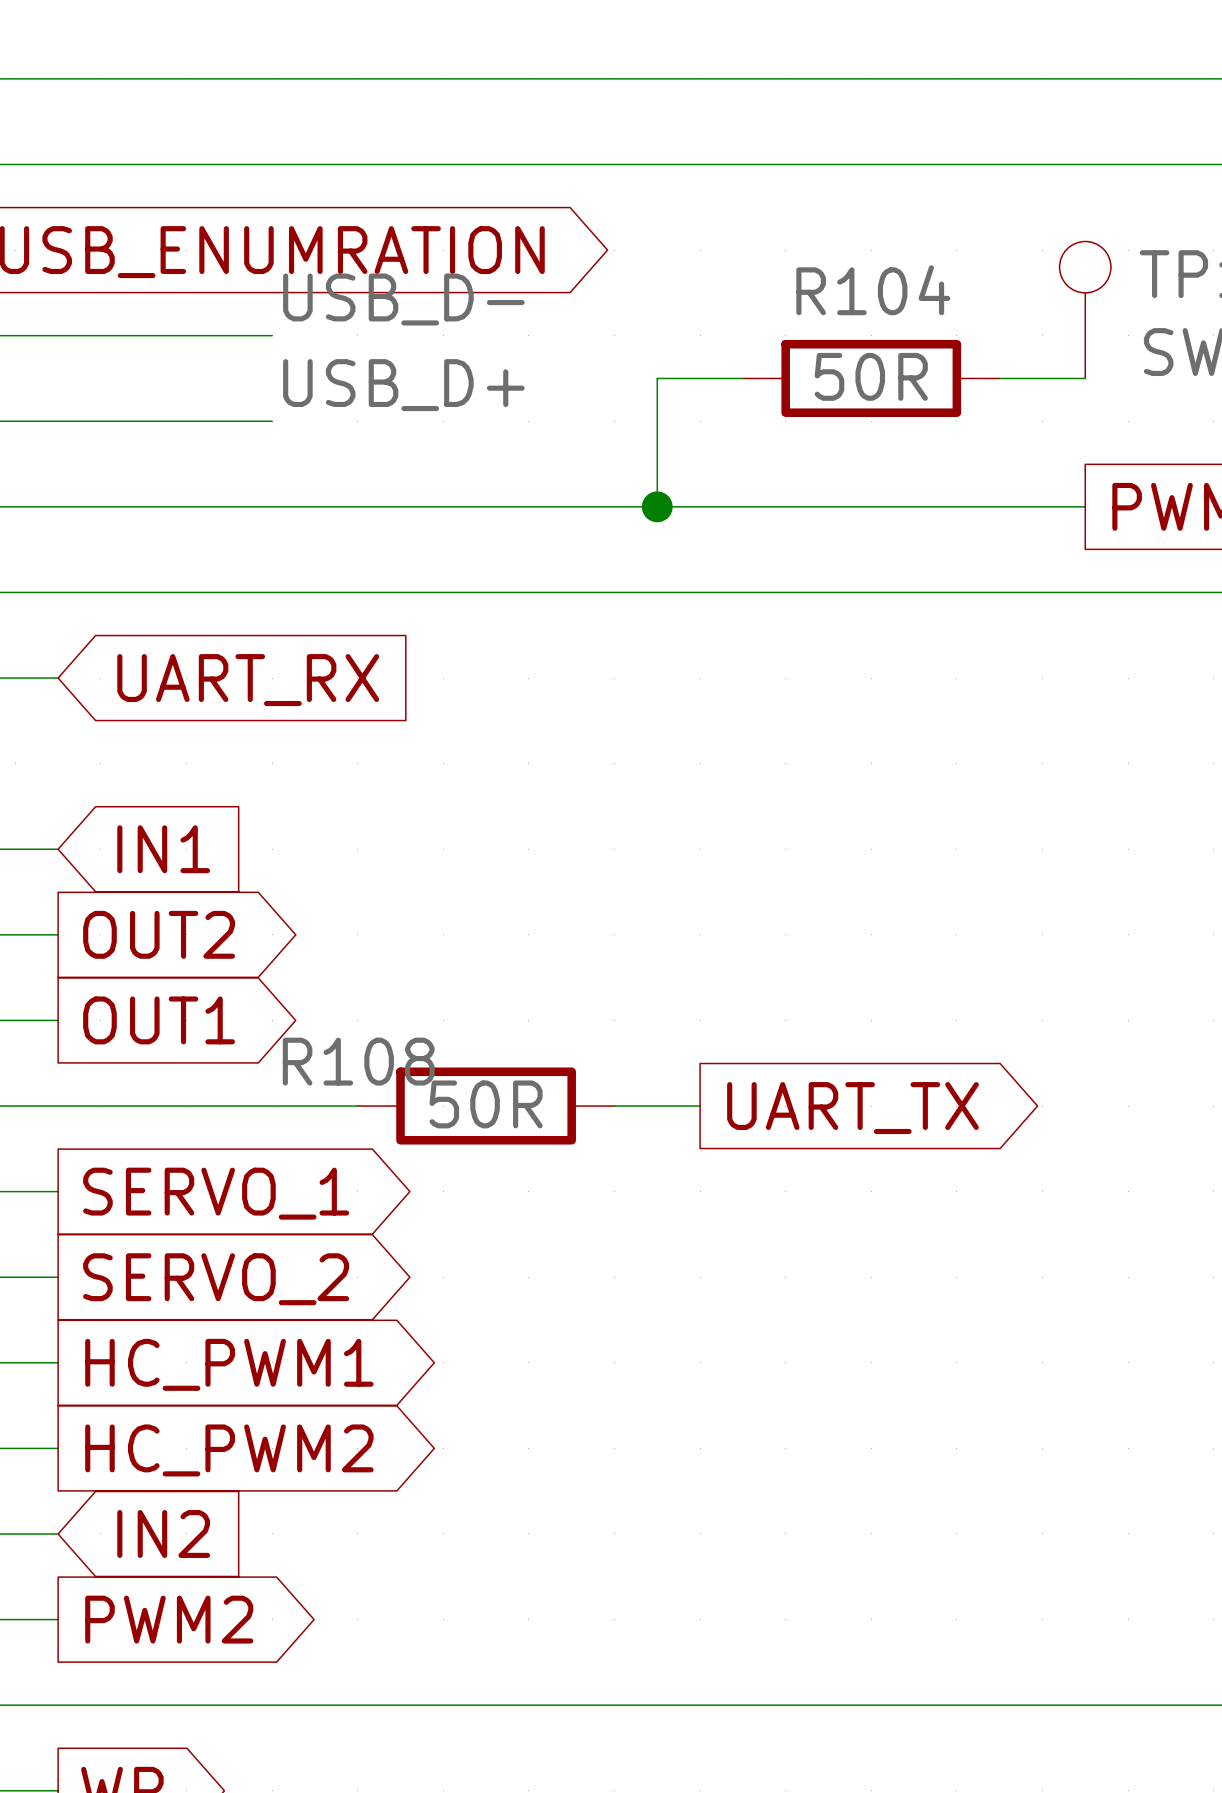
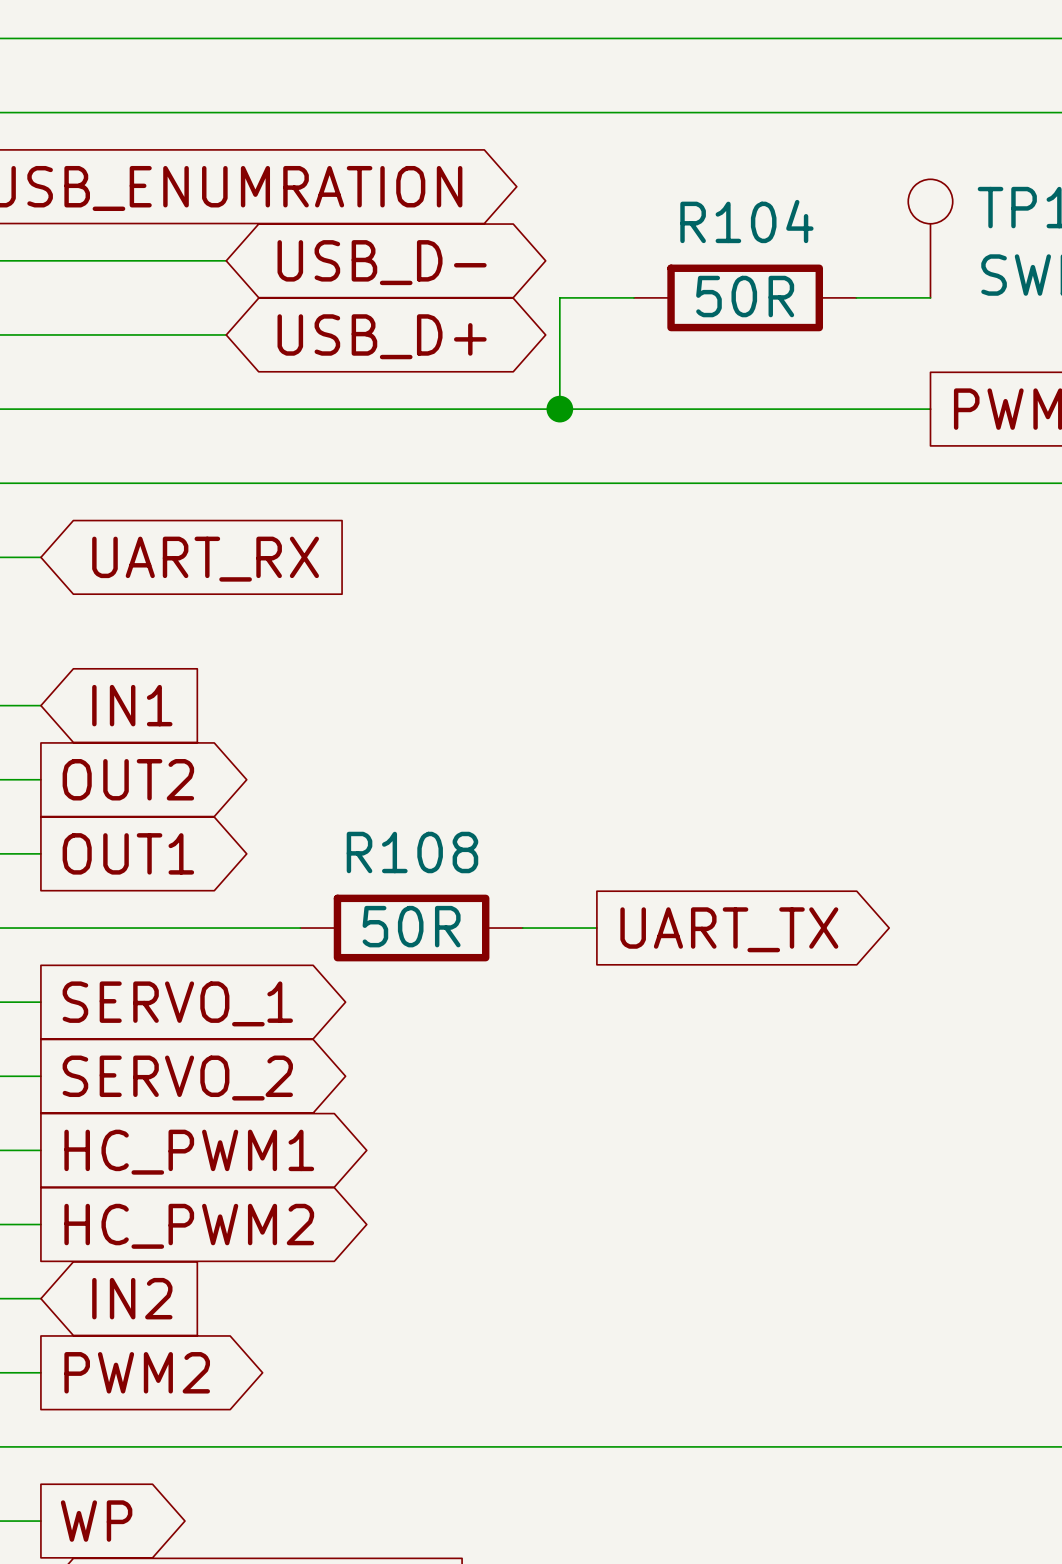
label: USB_D- (403, 299) -> none
global label: none -> USB_D- (382, 262)
label: USB_D+ (403, 385) -> none
global label: none -> USB_D+ (382, 336)
R108 name position: R108 (358, 1061) -> R108 (412, 852)

